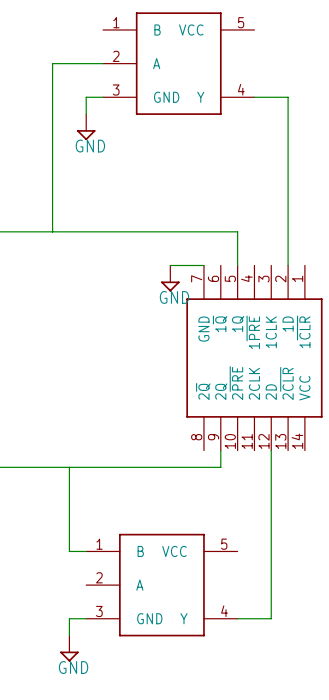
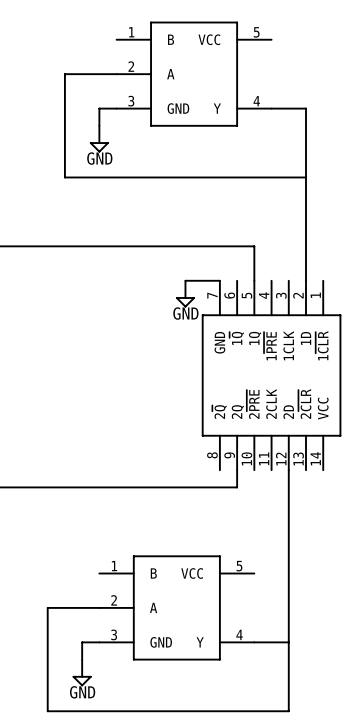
wire: (52, 164) (52, 231) -> (64, 177) (306, 177)
wire: (69, 467) (69, 551) (86, 551) -> none
wire: none -> (99, 607) (47, 607) (47, 711) (288, 711) (288, 642)

